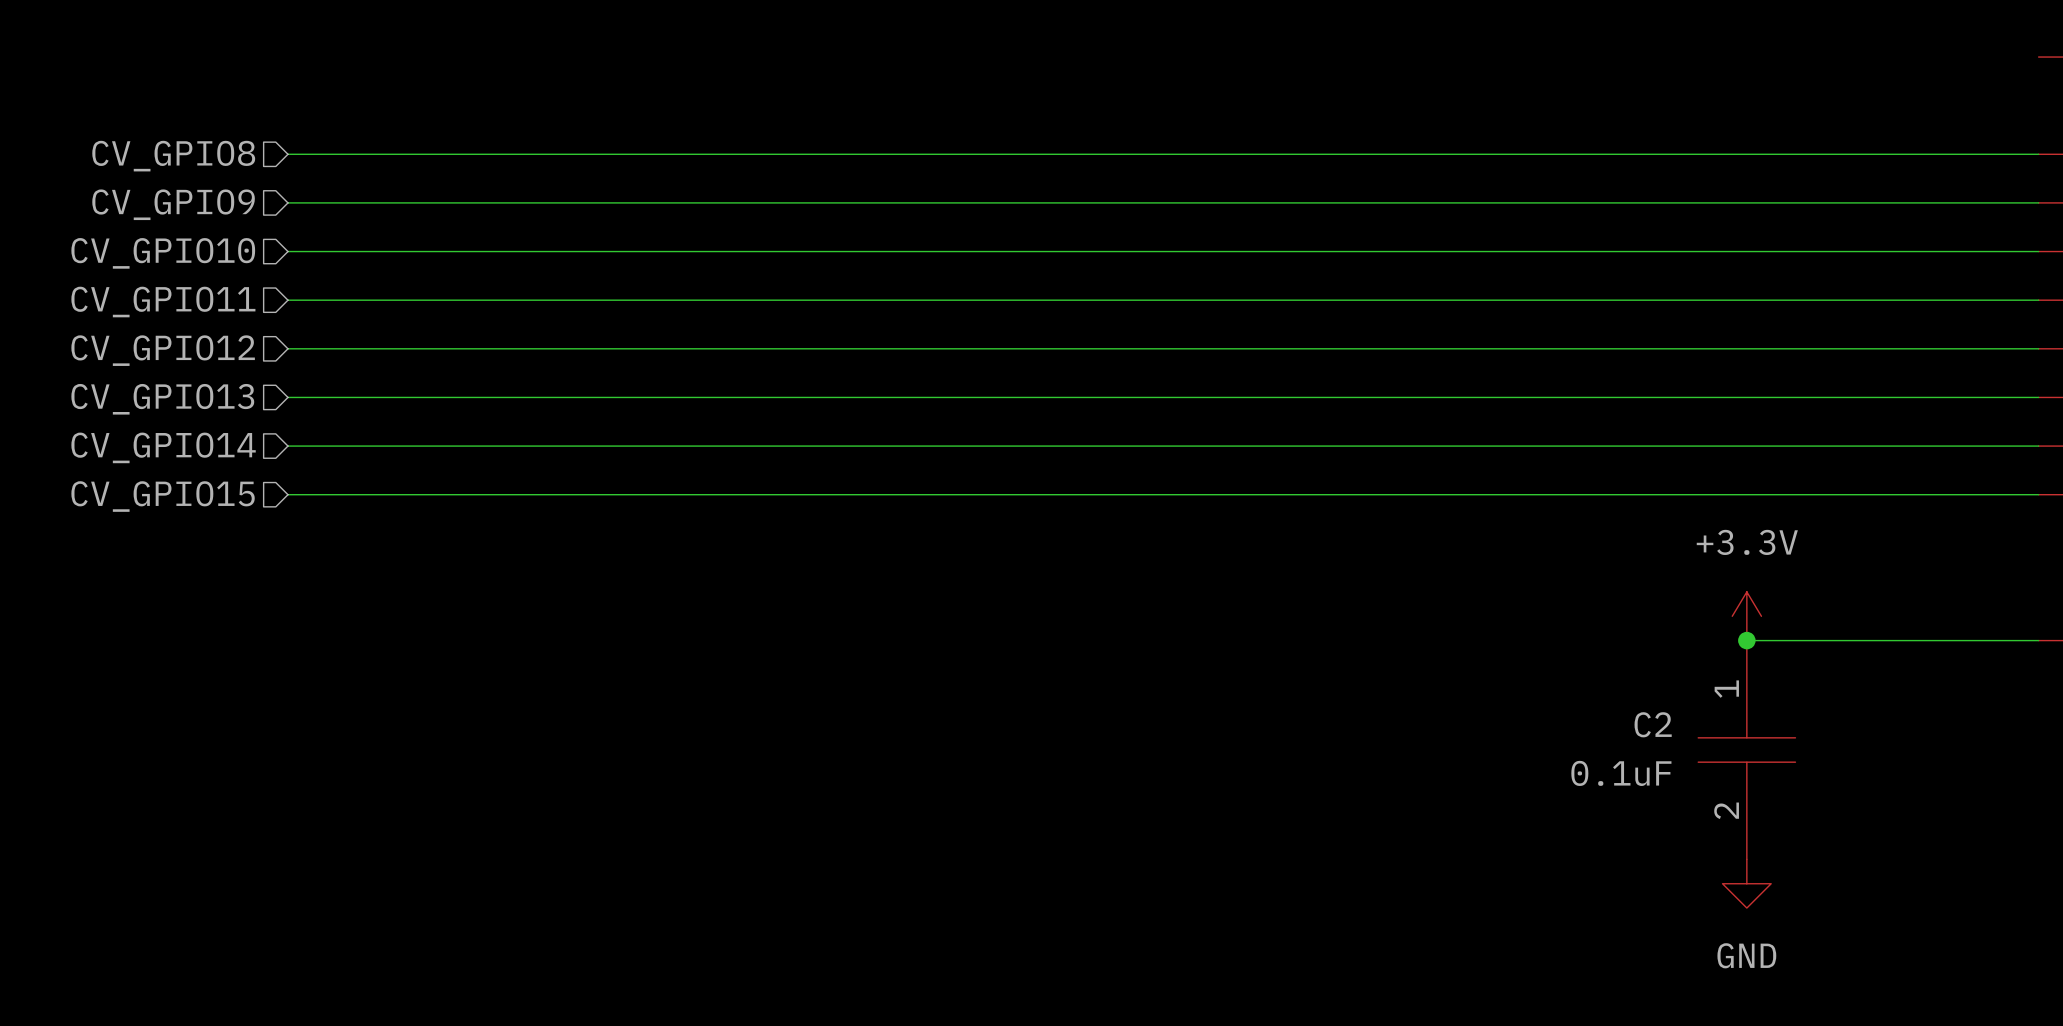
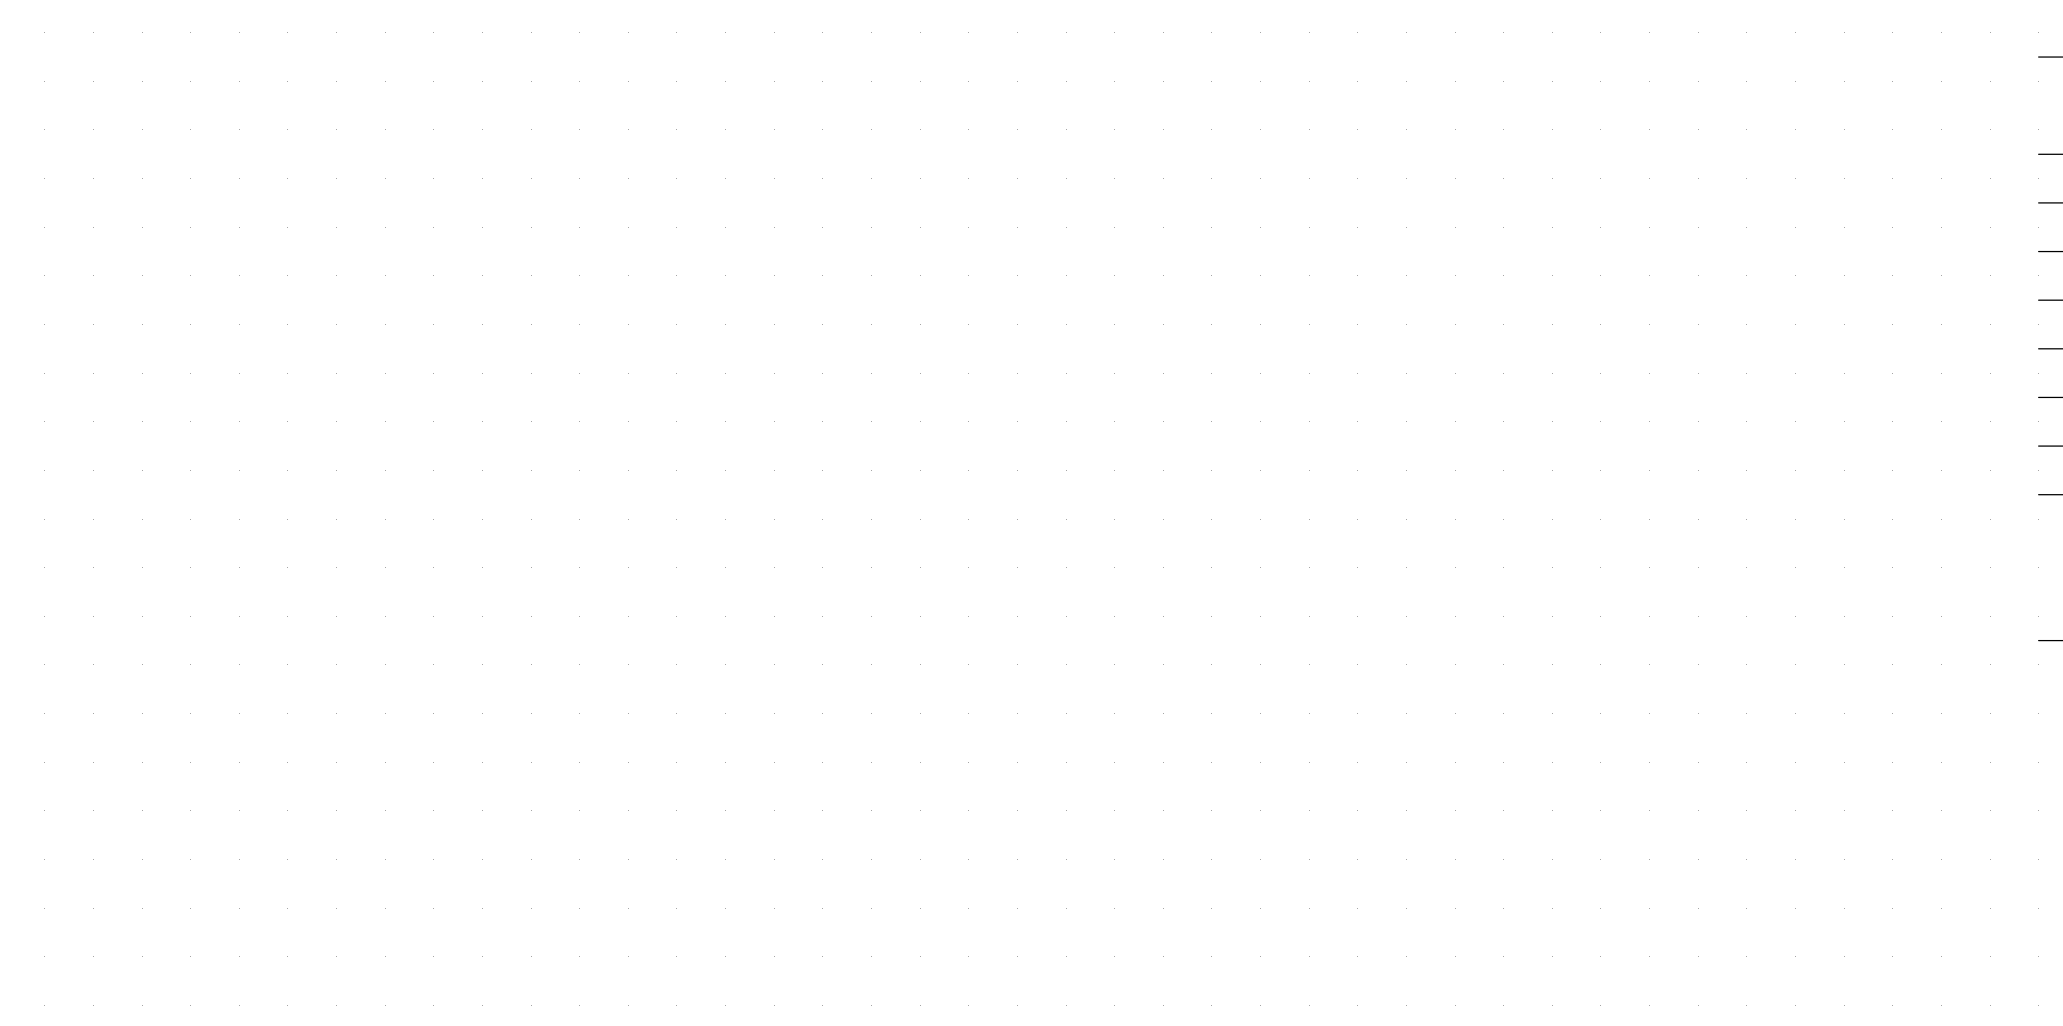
wire: (287, 154) (2038, 154) -> none
hierarchical label: CV_GPIO8 (173, 156) -> none
wire: (287, 202) (2038, 202) -> none
hierarchical label: CV_GPIO9 (173, 204) -> none
wire: (287, 251) (2038, 251) -> none
hierarchical label: CV_GPIO10 (163, 253) -> none
wire: (287, 300) (2038, 300) -> none
hierarchical label: CV_GPIO11 (163, 302) -> none
wire: (287, 348) (2038, 348) -> none
hierarchical label: CV_GPIO12 (163, 350) -> none
wire: (287, 397) (2038, 397) -> none
hierarchical label: CV_GPIO13 (162, 399) -> none
wire: (287, 446) (2038, 446) -> none
hierarchical label: CV_GPIO14 (163, 447) -> none
wire: (287, 494) (2038, 494) -> none
hierarchical label: CV_GPIO15 (163, 496) -> none
power symbol: +3.3V (1746, 616) -> none
wire: (1746, 640) (2038, 640) -> none
junction: (1746, 640) -> none
C2: (1746, 750) -> none
power symbol: GND (1746, 883) -> none

